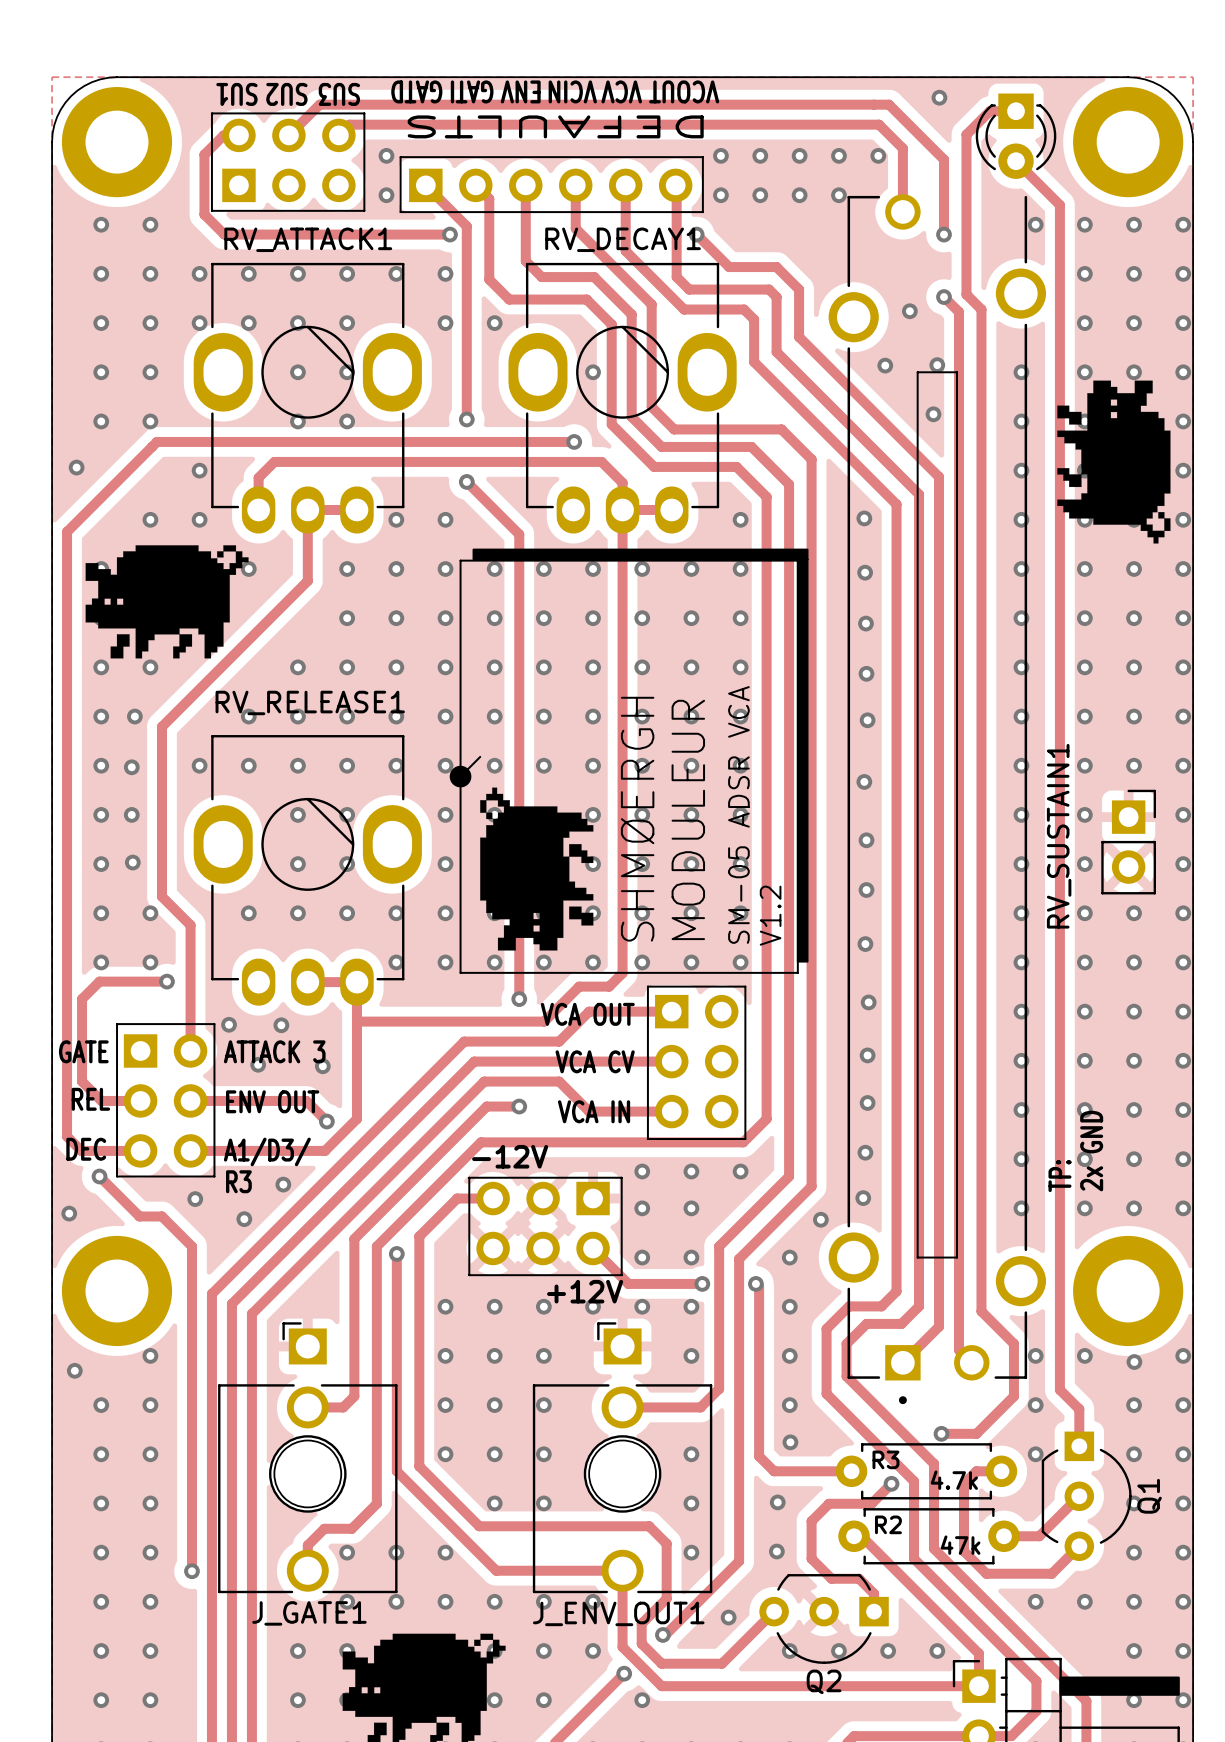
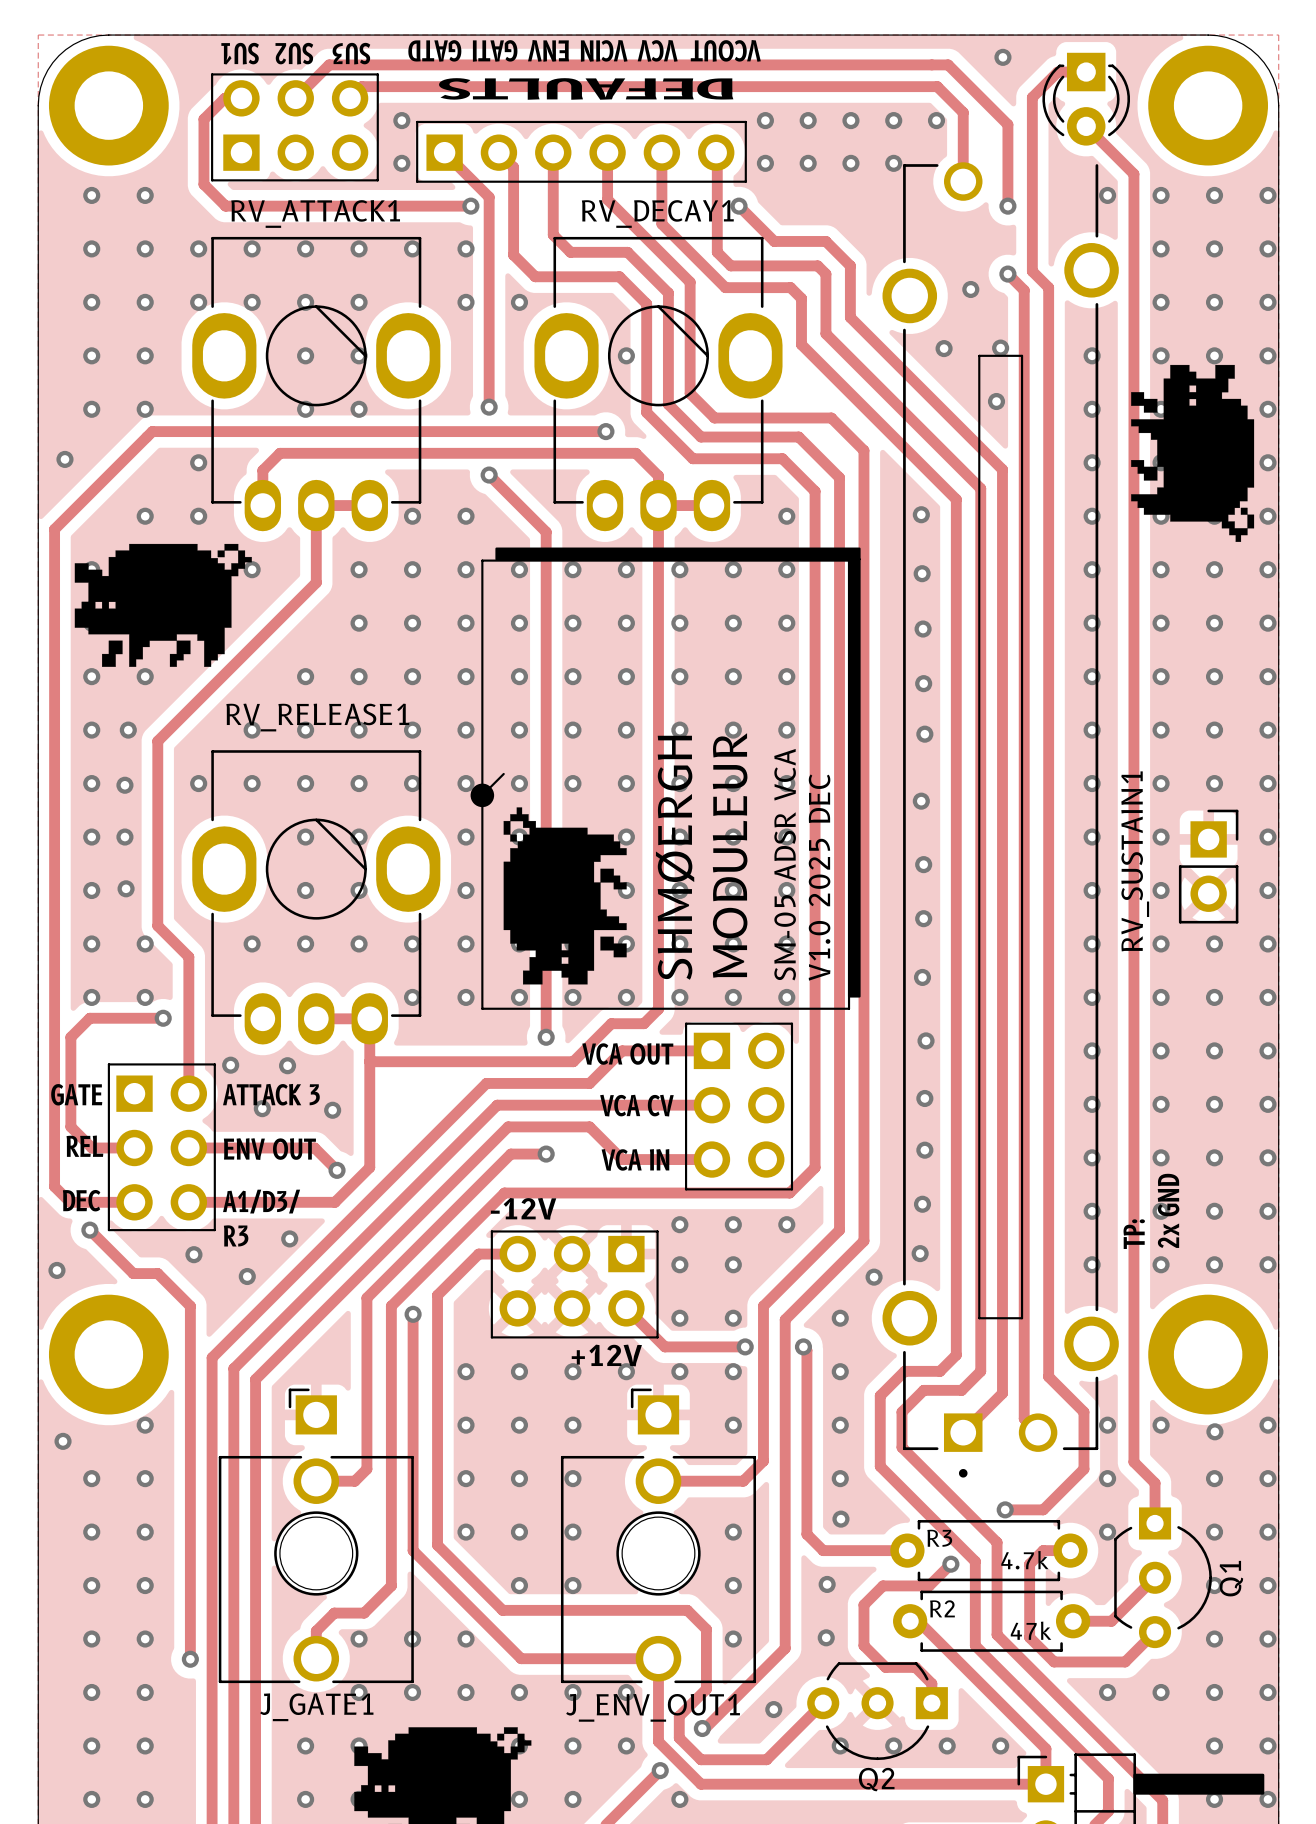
text: V1.2 (770, 915) -> V1.0 2025 DEC (819, 877)

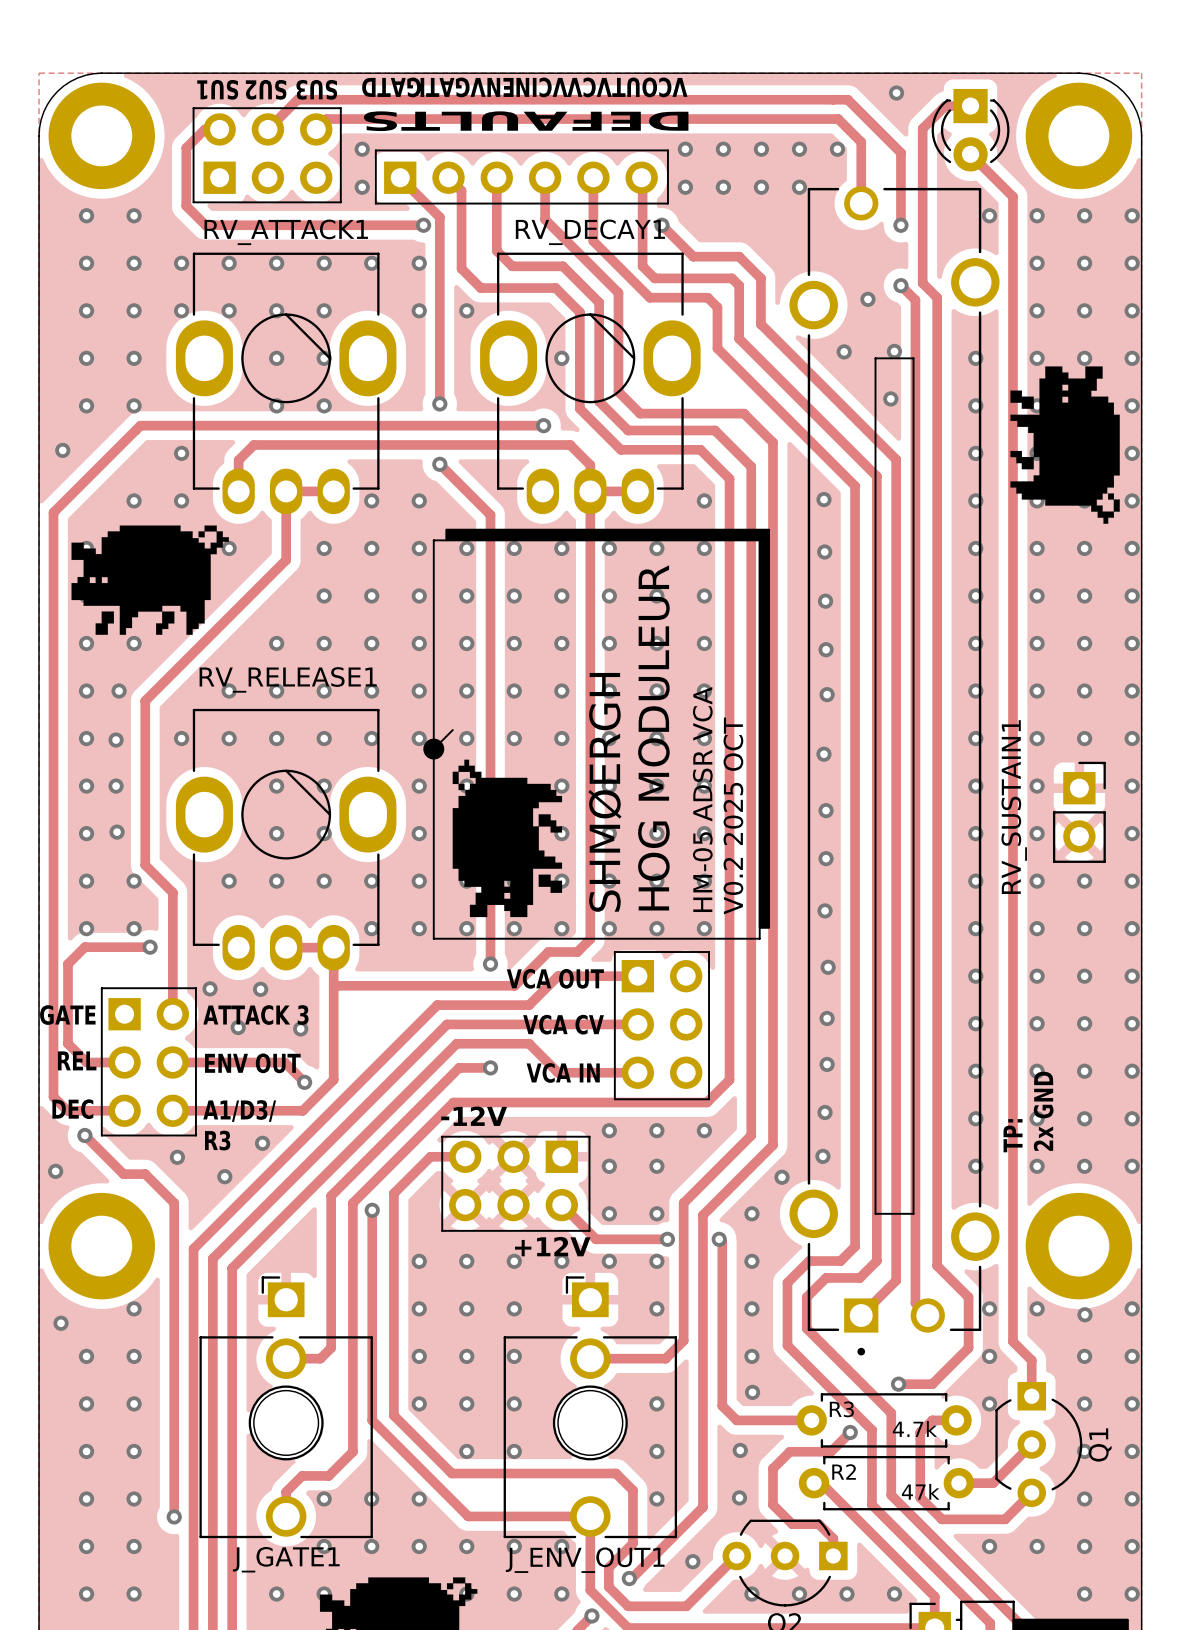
RV_SUSTAIN1 footprint: [882, 162, 1119, 1478] -> [789, 186, 1000, 1356]
text: MODULEUR (730, 855) -> HOG MODULEUR (653, 737)
text: SM-05 ADSR VCA (785, 864) -> HM-05 ADSR VCA (702, 799)
text: V1.0 2025 DEC (819, 877) -> V0.2 2025 OCT (733, 815)

